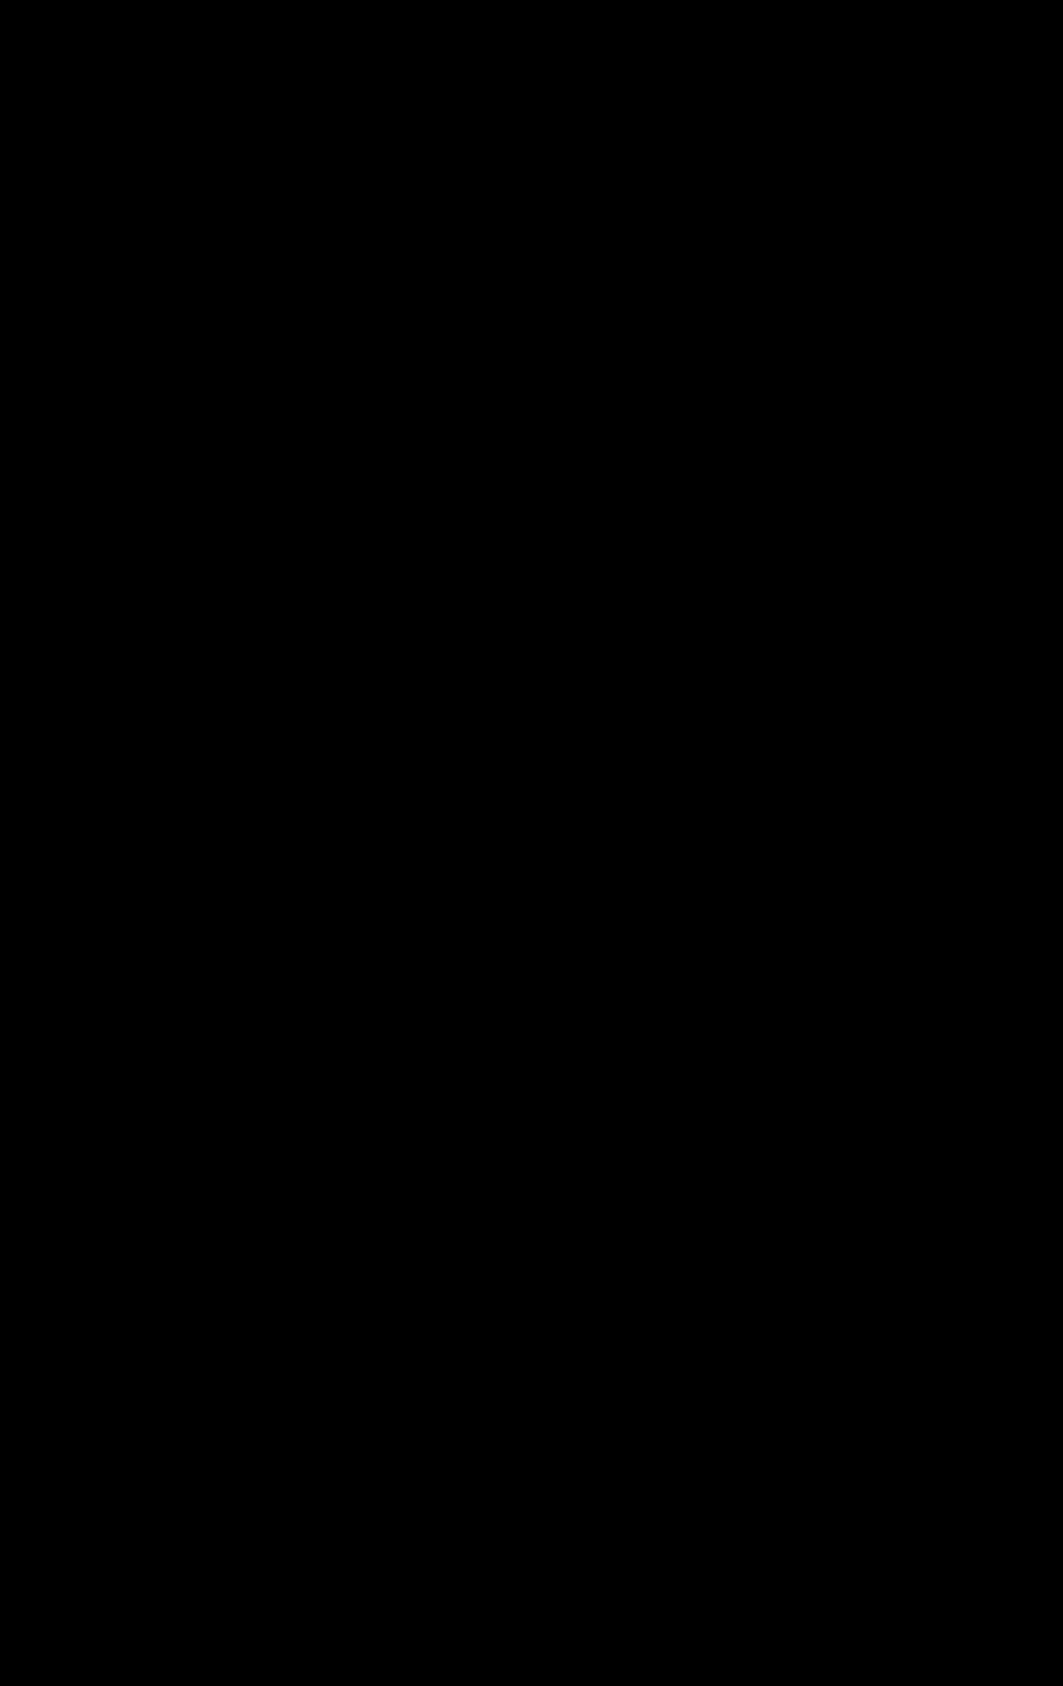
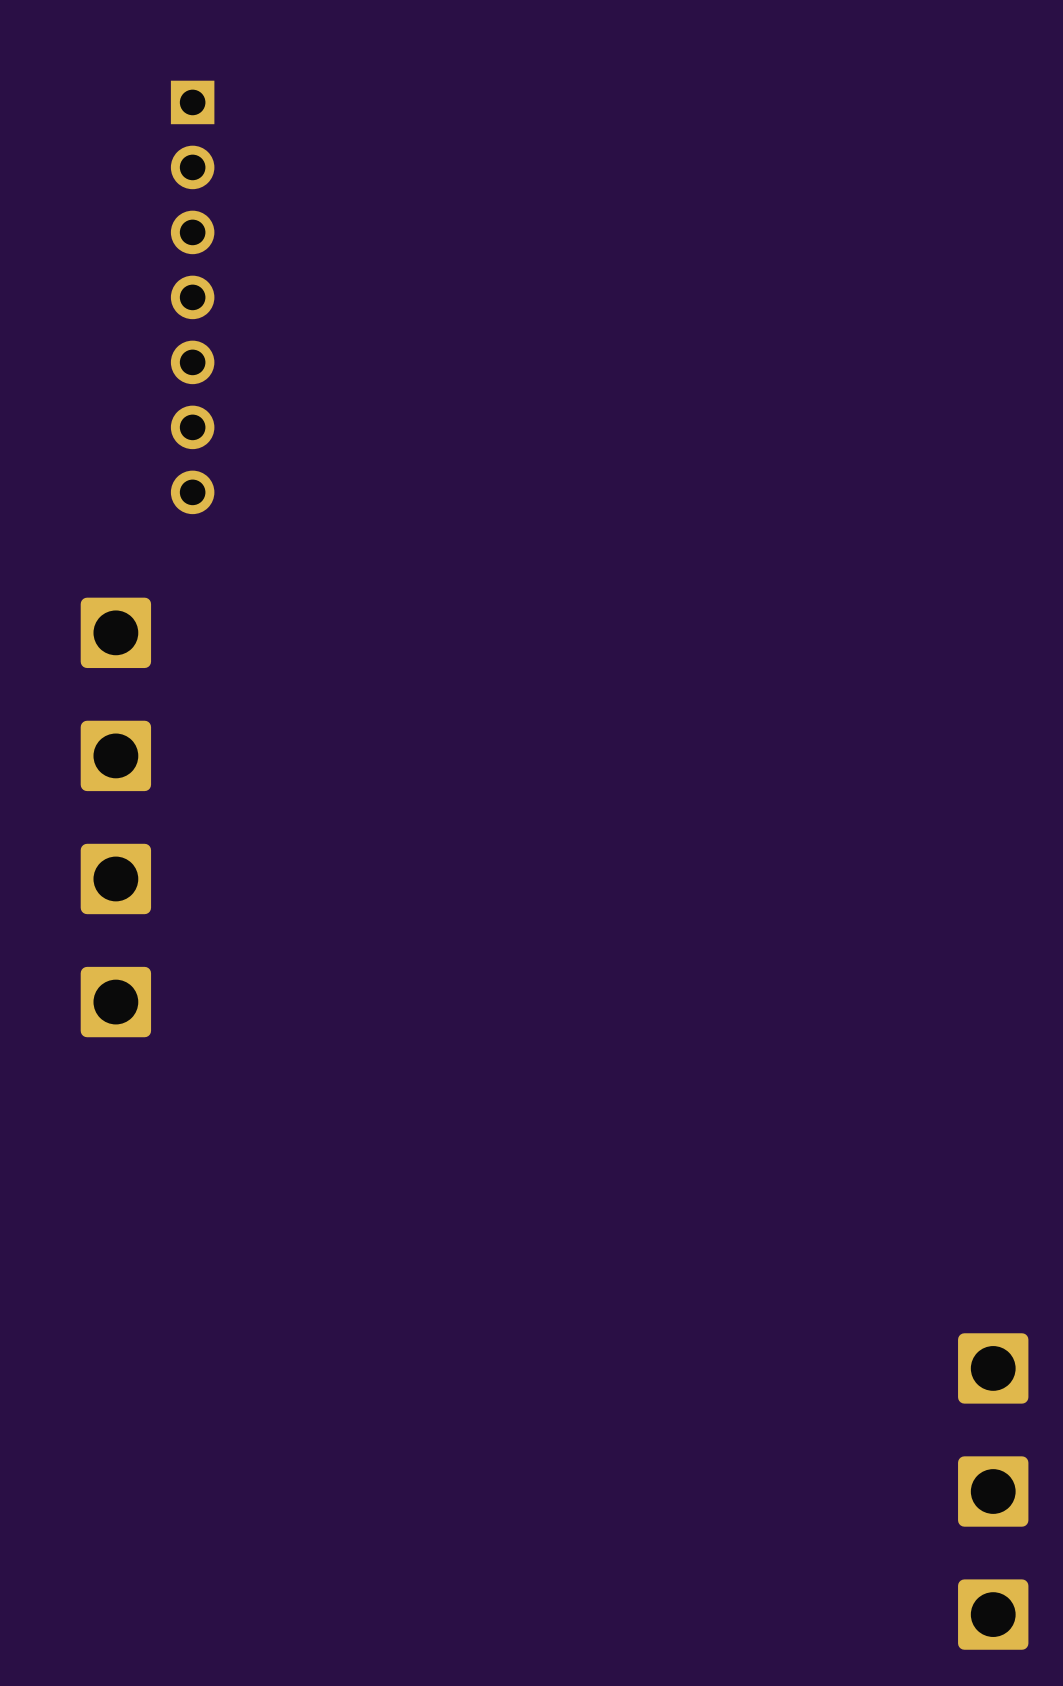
part: none -> (192, 297)
part: none -> (115, 632)
part: none -> (115, 755)
part: none -> (115, 878)
part: none -> (115, 1002)
part: none -> (993, 1368)
part: none -> (993, 1491)
part: none -> (993, 1614)

